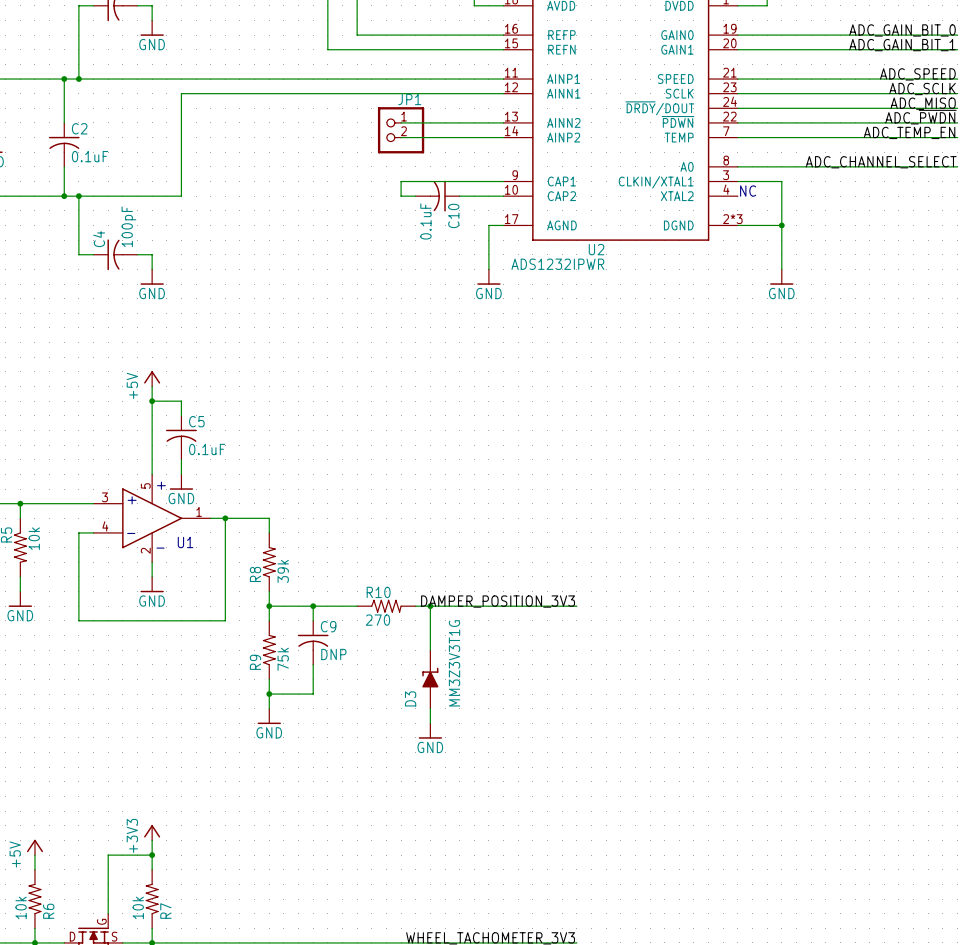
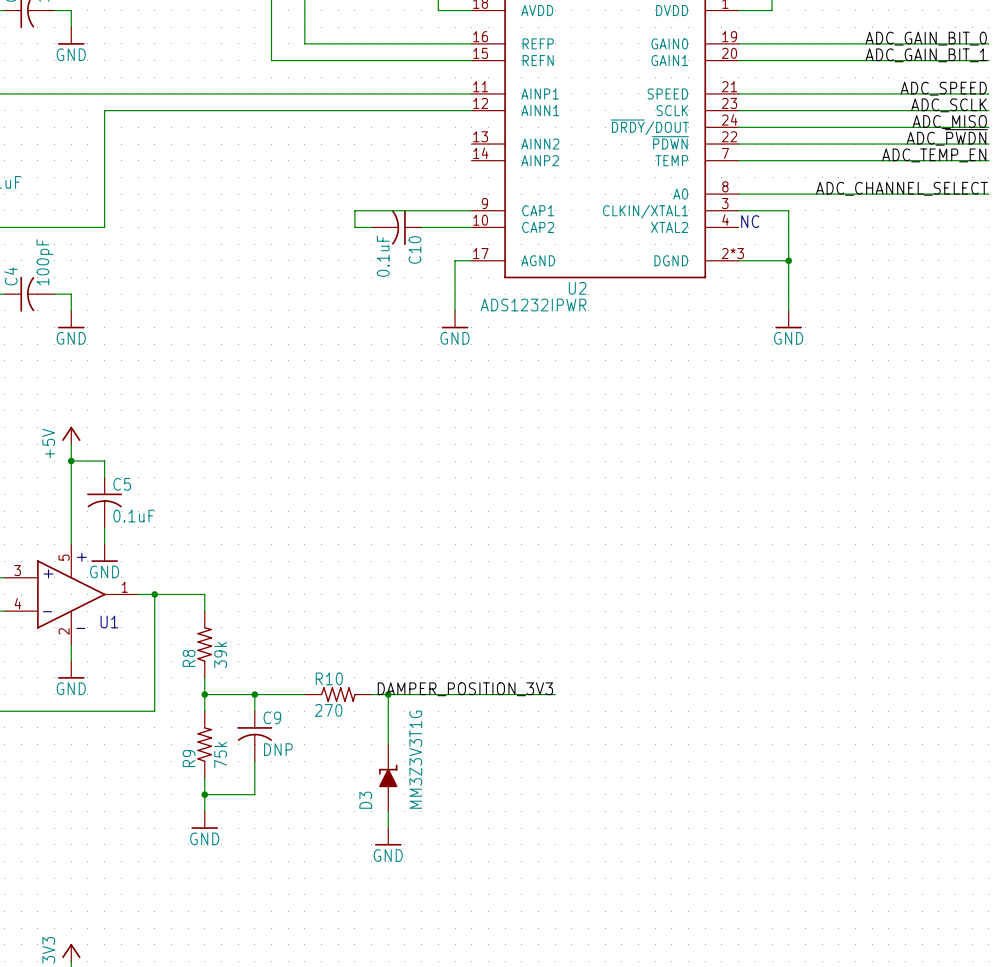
wire: (401, 122) (503, 122) -> none
JP1: (401, 130) -> none
wire: (401, 137) (503, 137) -> none

